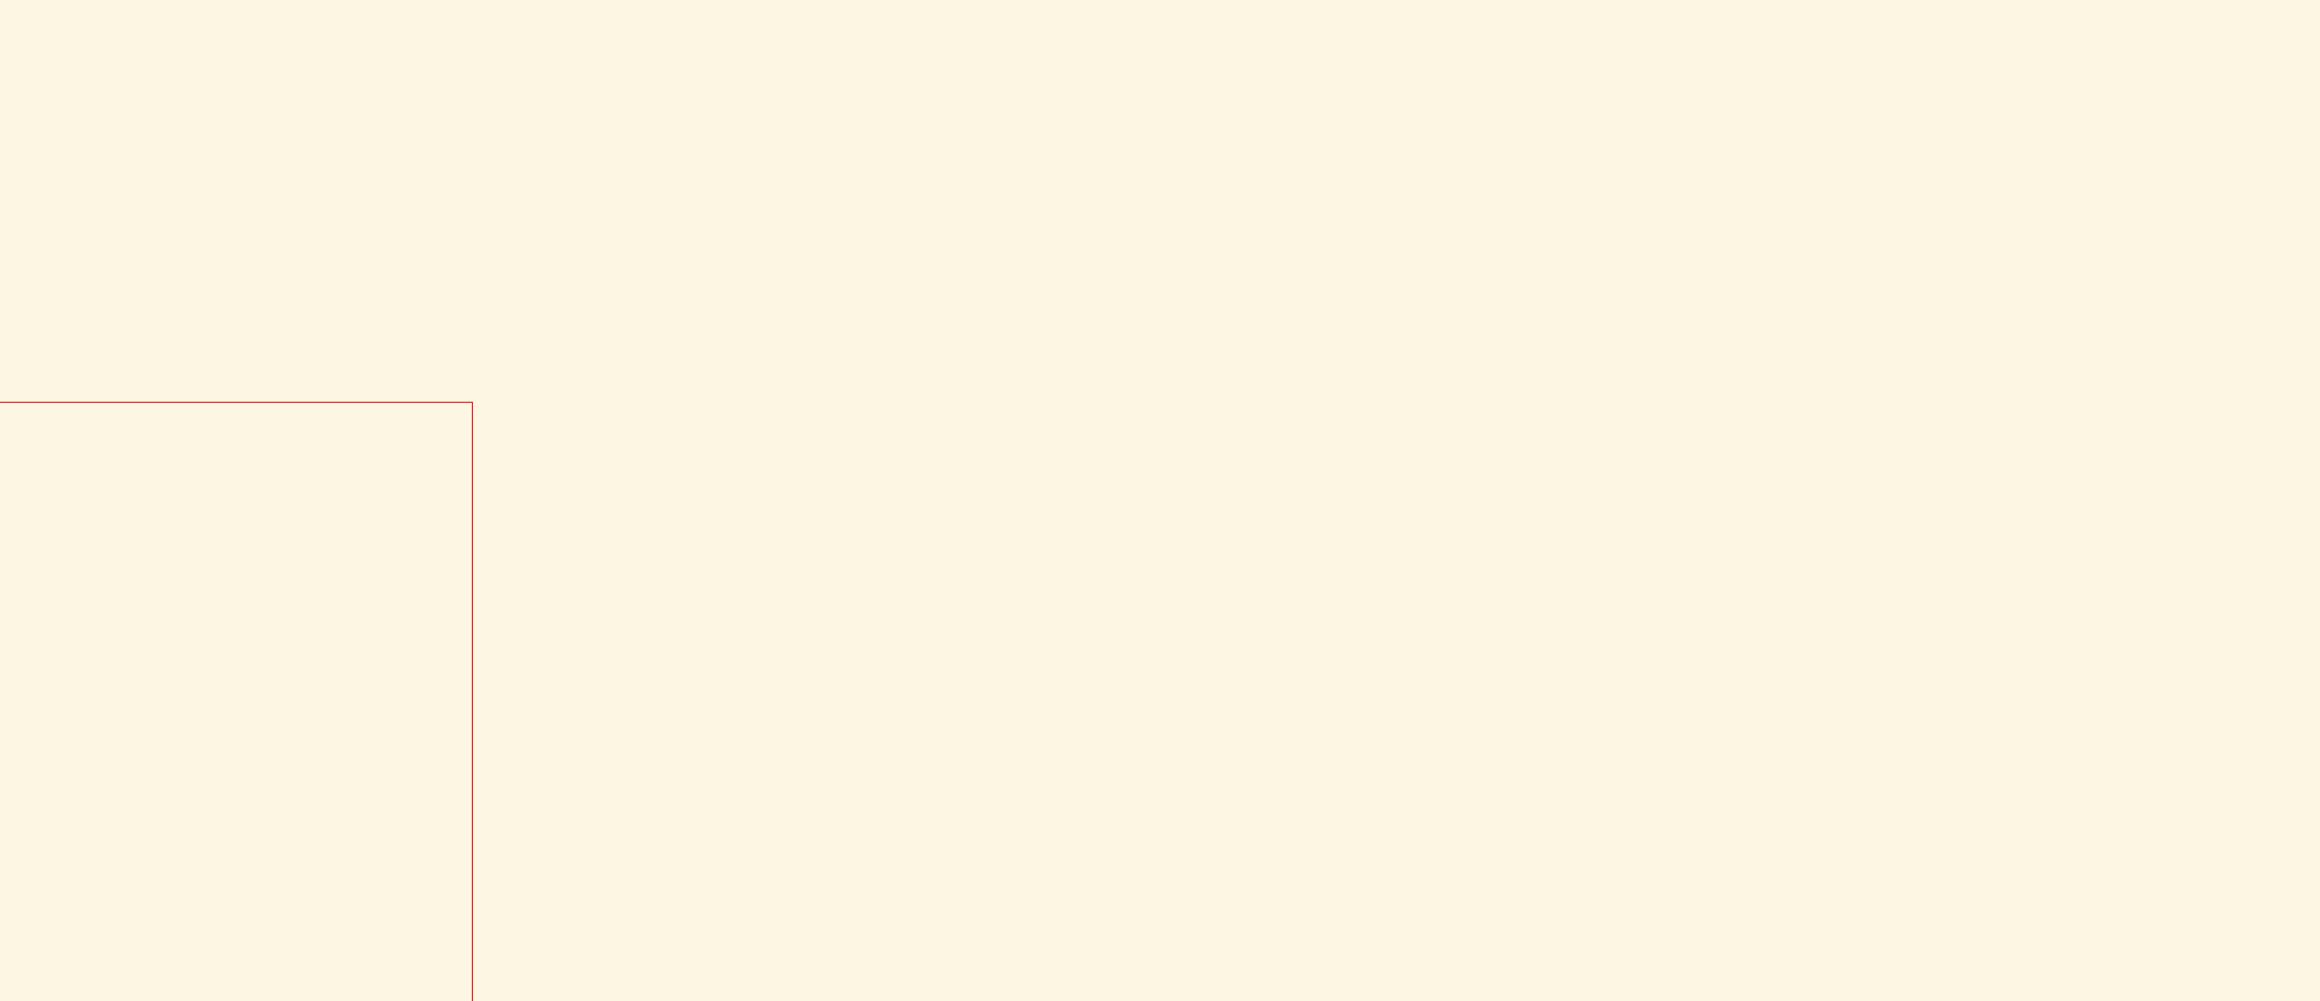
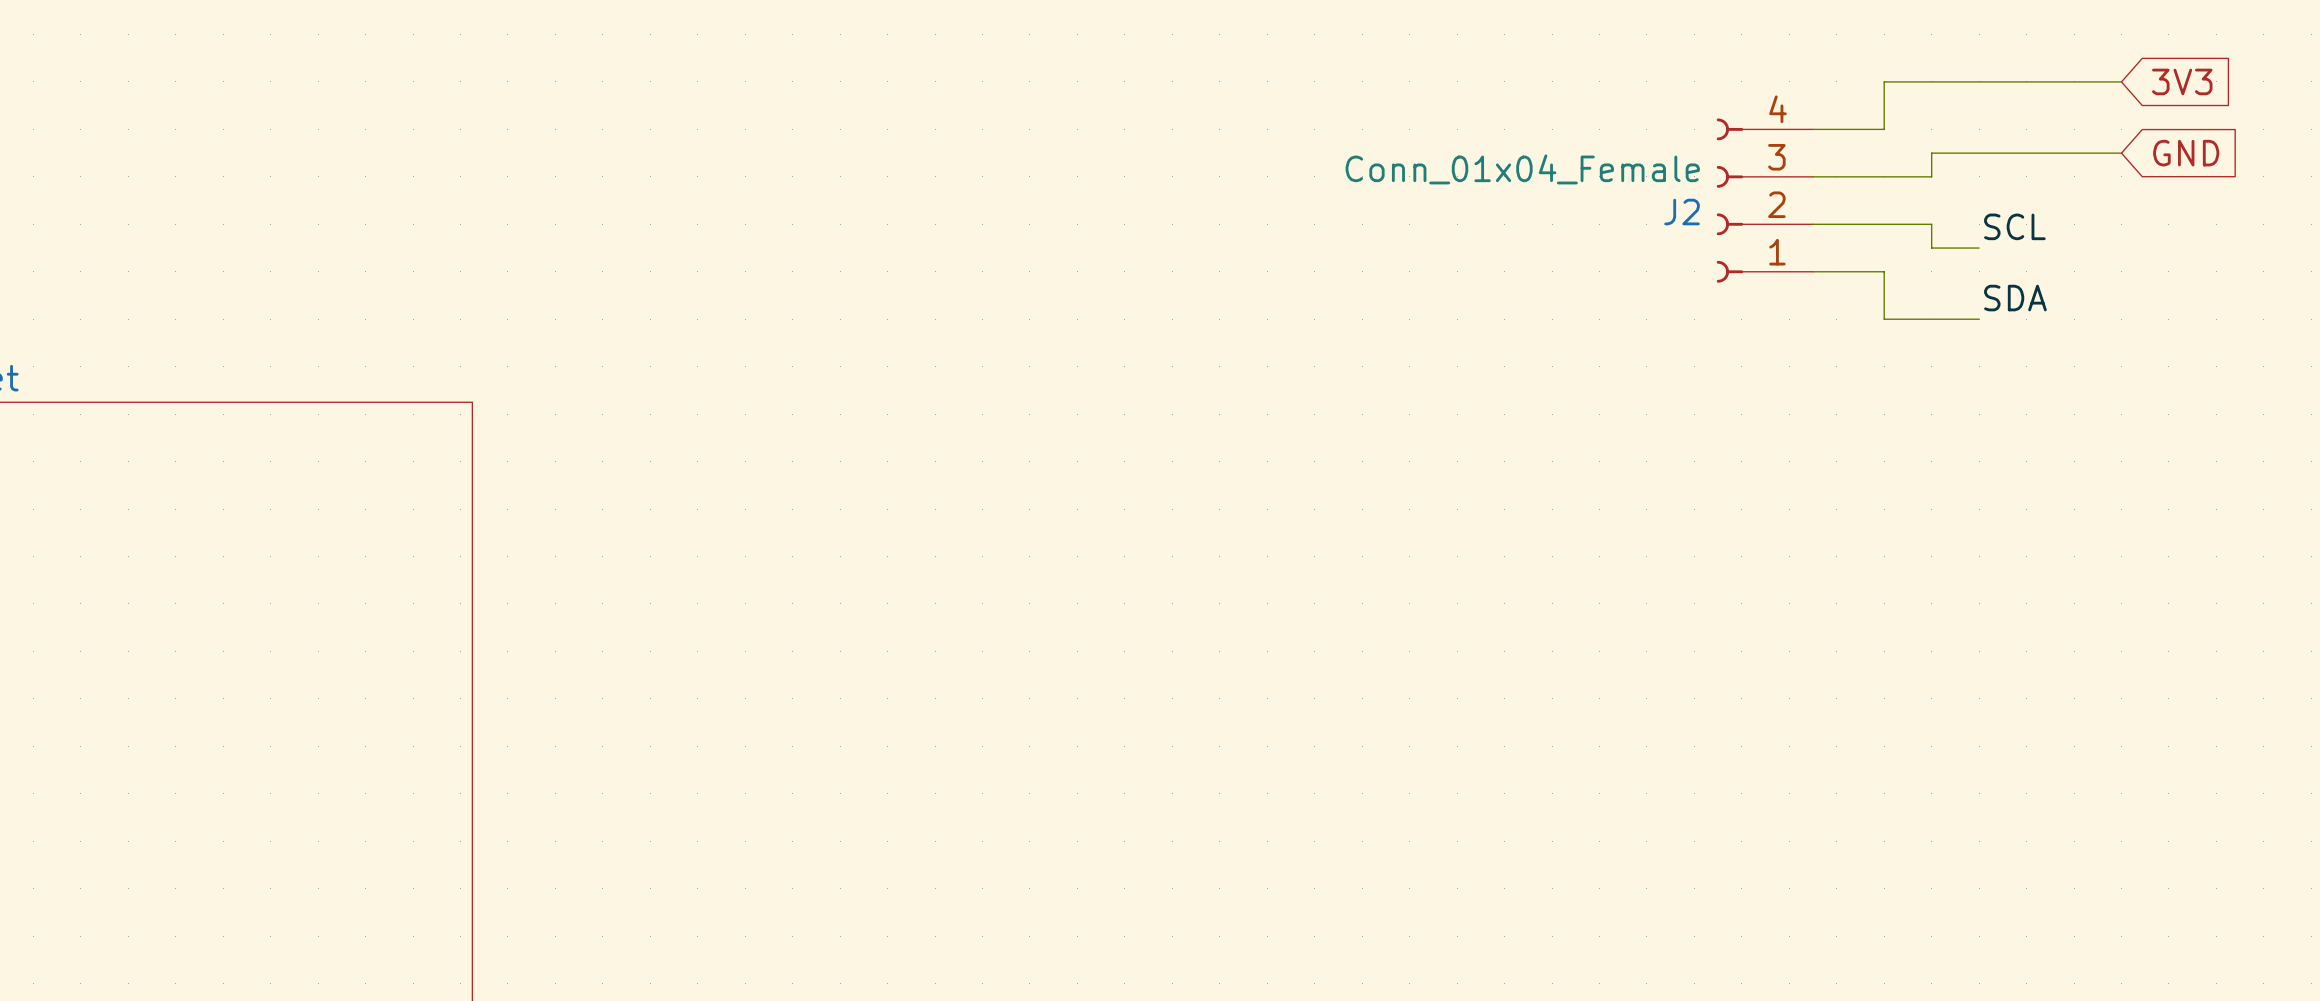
wire: none -> (2121, 81) (1884, 81) (1884, 129) (1813, 129)
global label: none -> 3V3 (2182, 81)
wire: none -> (2121, 153) (1931, 153) (1931, 176) (1813, 176)
global label: none -> GND (2186, 153)
J2: none -> Conn_01x04_Female (1764, 200)
wire: none -> (1813, 224) (1931, 224) (1931, 248) (1979, 248)
label: none -> SCL (2014, 226)
wire: none -> (1813, 271) (1884, 271) (1884, 319) (1979, 319)
label: none -> SDA (2015, 298)

